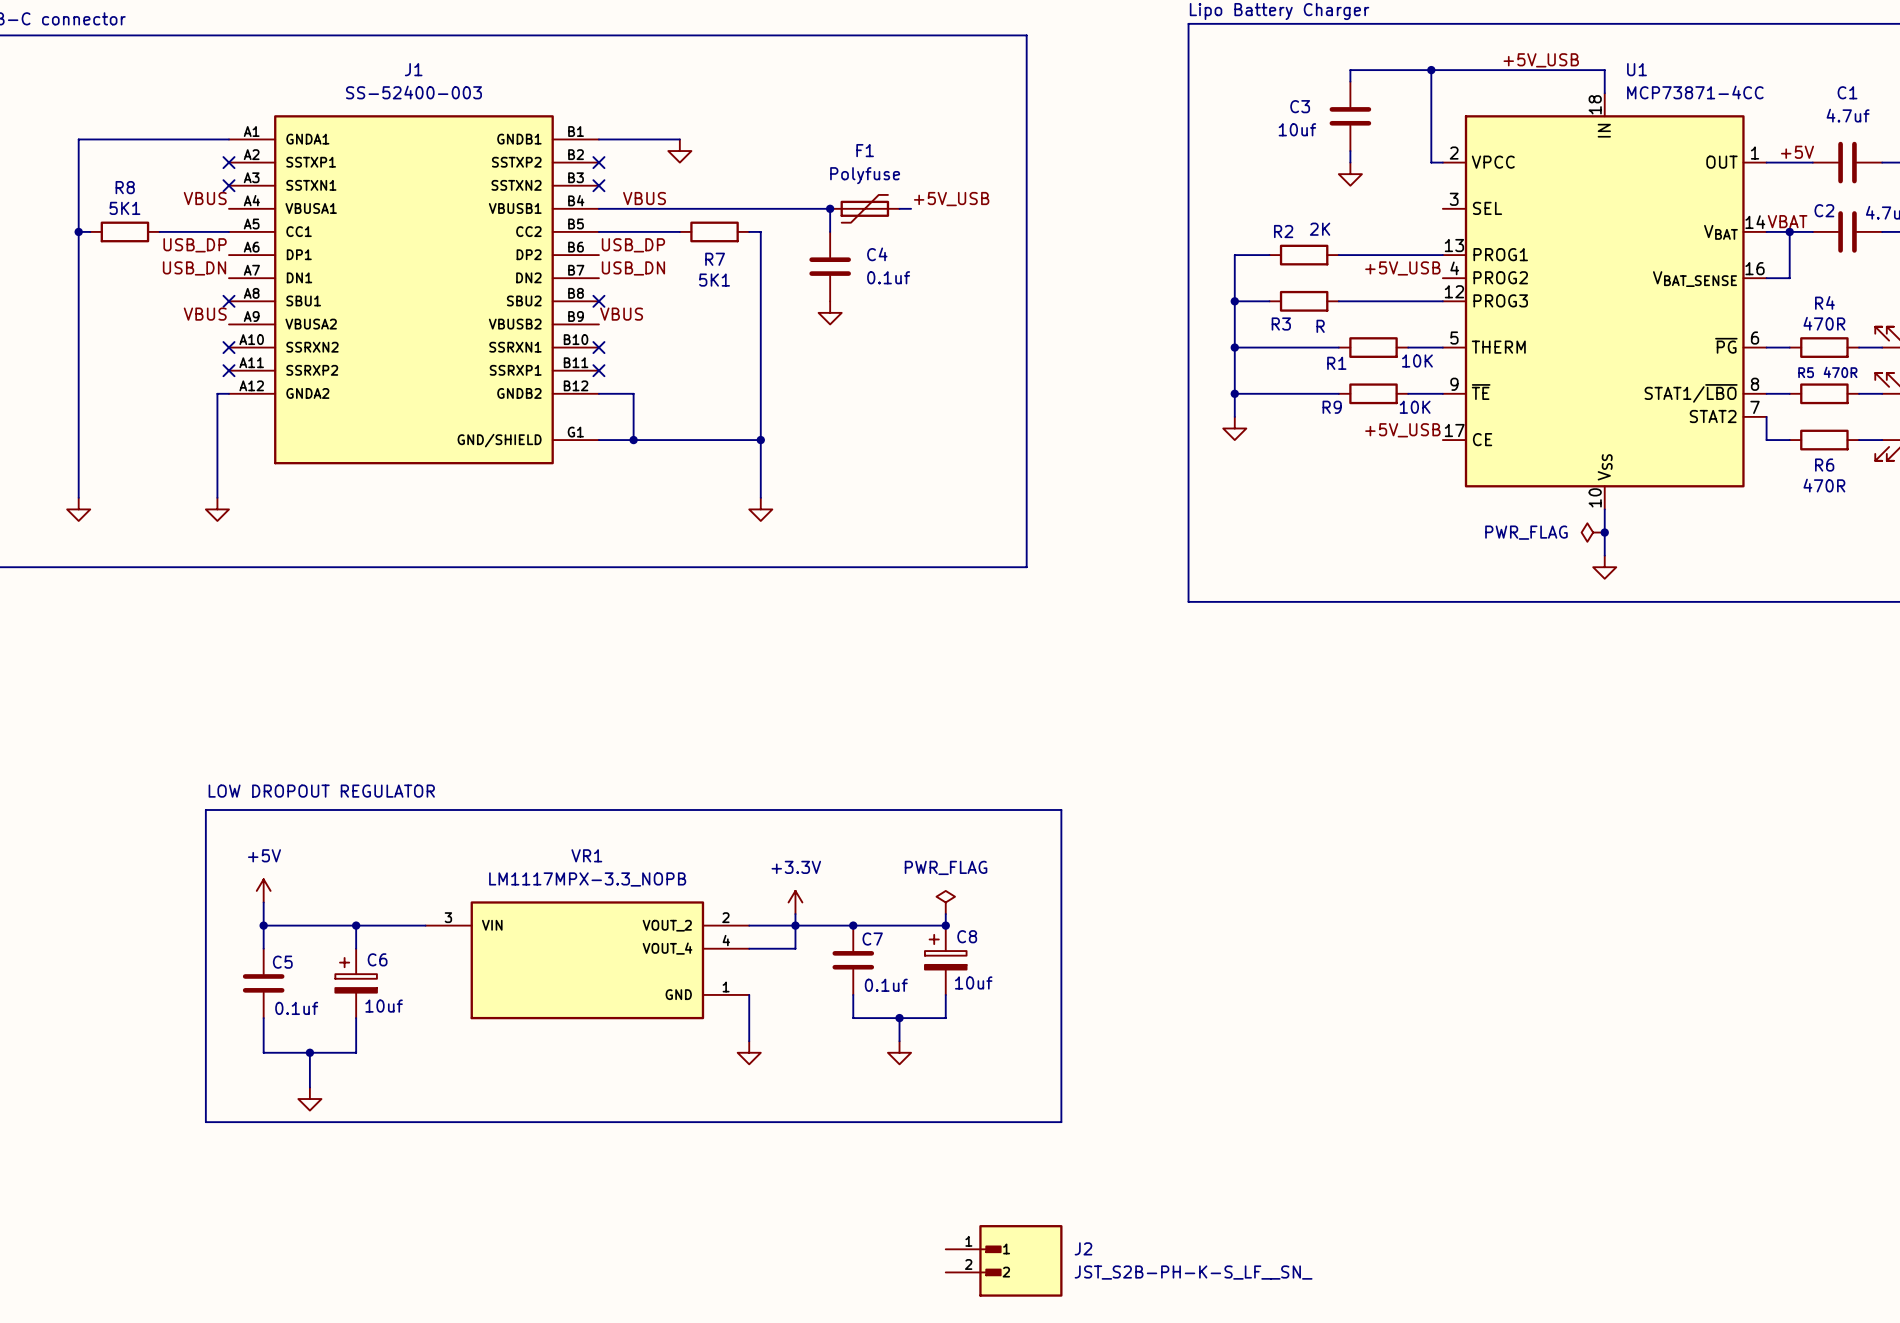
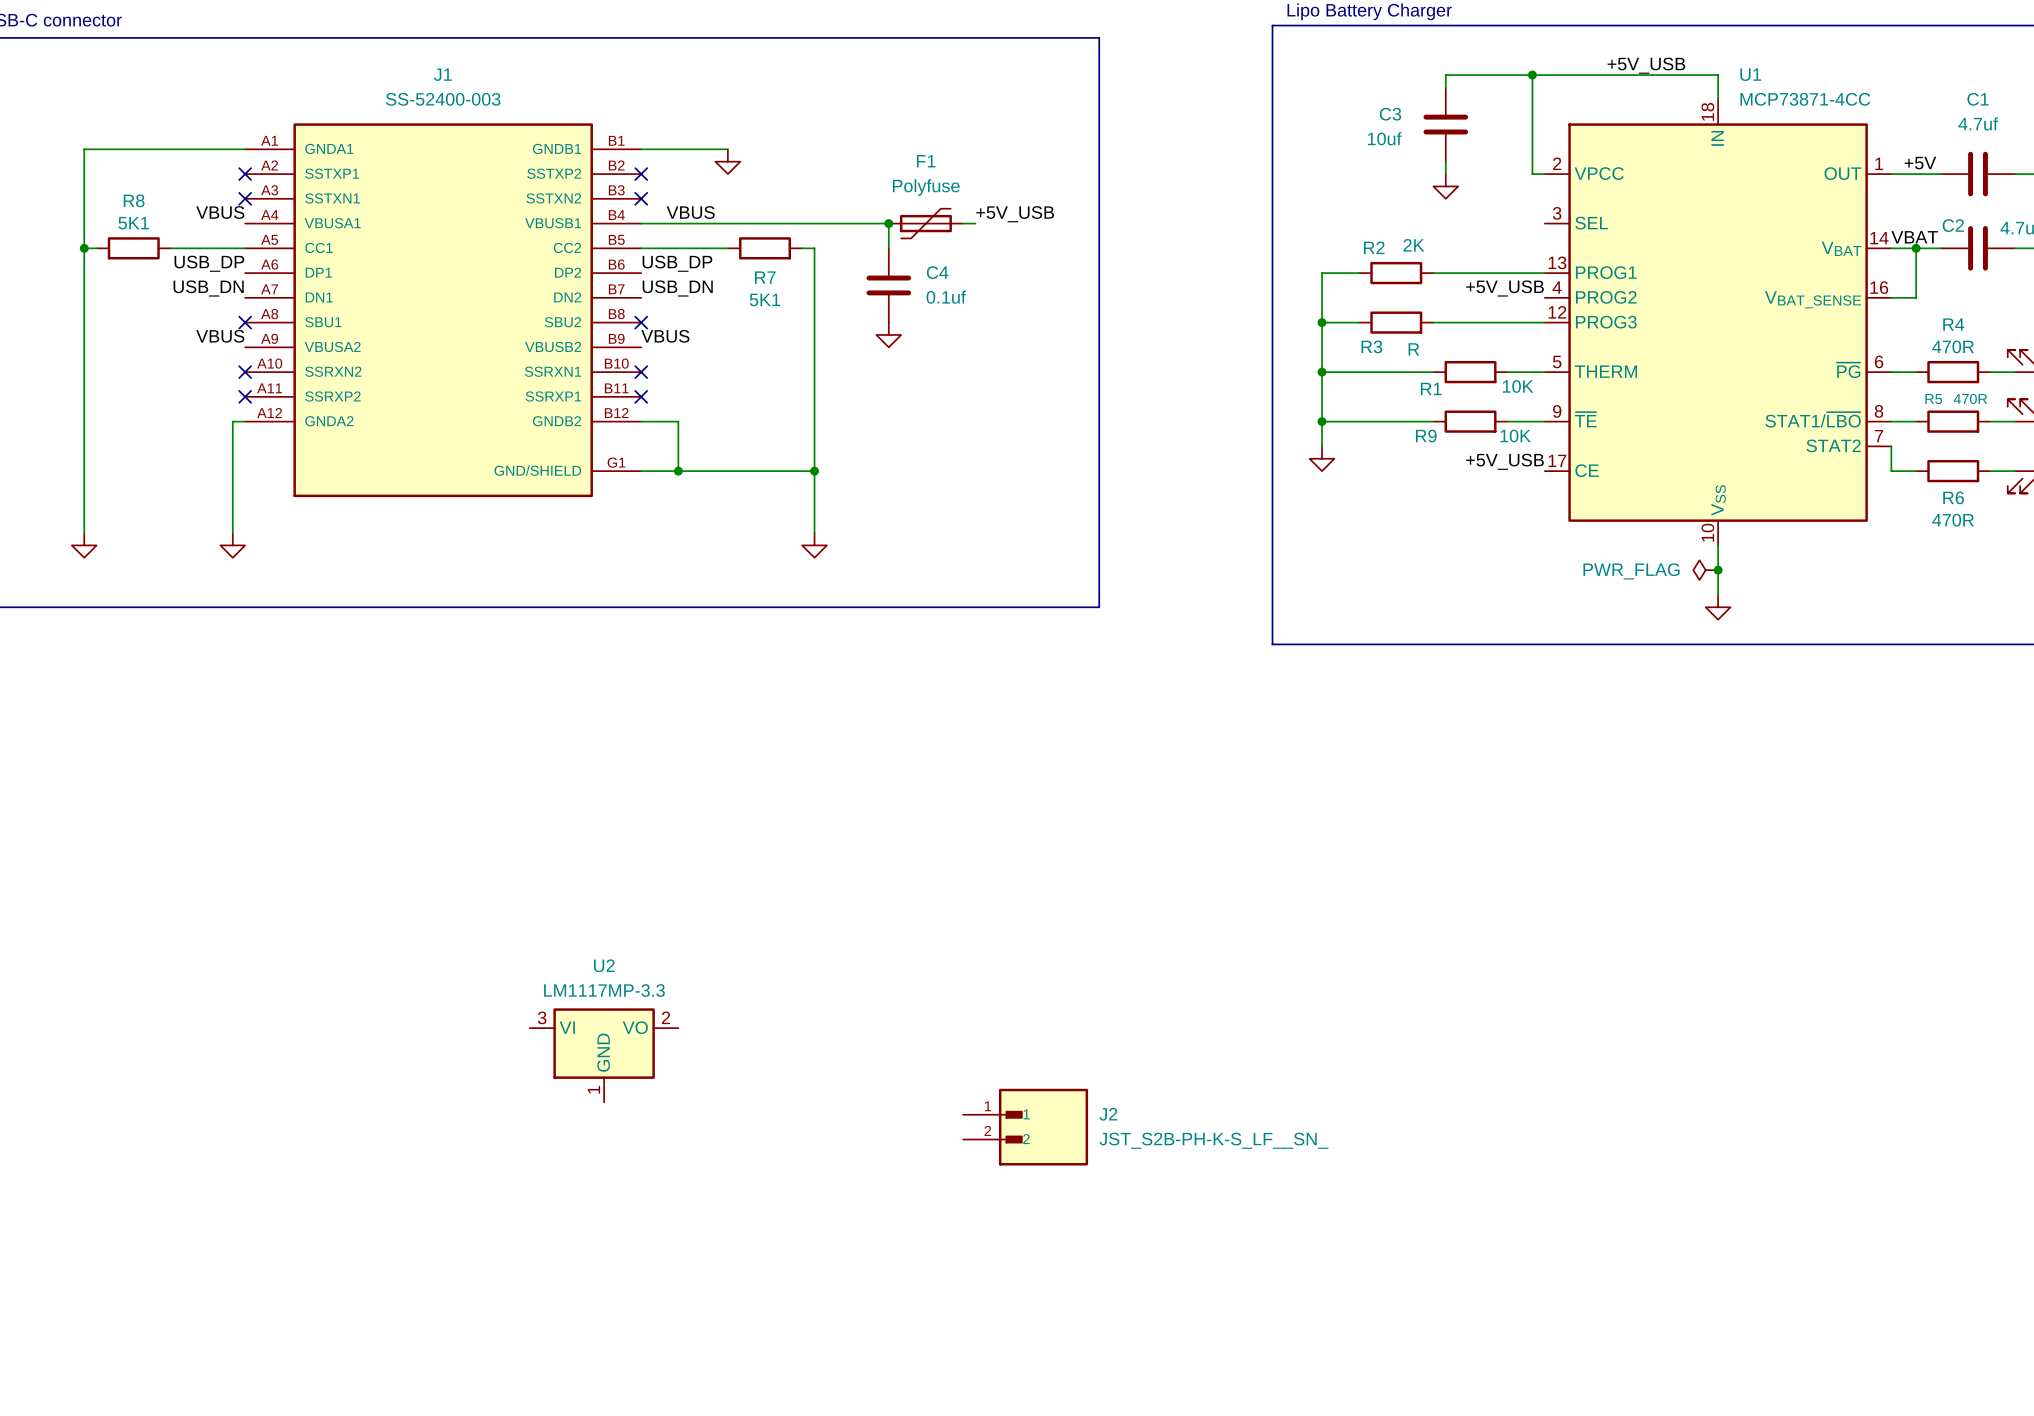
text: LOW DROPOUT REGULATOR (321, 791) -> none
line: (205, 809) (1061, 809) (1061, 1122) (205, 1122) (205, 809) -> none
power symbol: +5V (263, 890) -> none
wire: (263, 902) (263, 948) -> none
power symbol: +3.3V (795, 902) -> none
power symbol: PWR_FLAG (945, 902) -> none
wire: (795, 914) (795, 948) (749, 948) -> none
wire: (945, 914) (945, 925) (749, 925) -> none
wire: (263, 925) (425, 925) -> none
junction: (263, 925) -> none
wire: (356, 925) (356, 948) -> none
junction: (356, 925) -> none
junction: (795, 925) -> none
junction: (853, 925) -> none
junction: (945, 925) -> none
VR1: LM1117MPX-3.3_NOPB (587, 960) -> none
C7: 0.1uf (853, 960) -> none
C8: 10uf (945, 960) -> none
C5: 0.1uf (263, 983) -> none
C6: 10uf (356, 983) -> none
U2: none -> LM1117MP-3.3 (604, 1055)
wire: (749, 994) (749, 1041) -> none
wire: (853, 994) (853, 1018) (945, 1018) (945, 994) -> none
wire: (263, 1018) (263, 1052) (356, 1052) (356, 1018) -> none
wire: (899, 1018) (899, 1041) -> none
junction: (899, 1018) -> none
wire: (309, 1052) (309, 1087) -> none
junction: (309, 1052) -> none
power symbol: (749, 1052) -> none
power symbol: (899, 1052) -> none
power symbol: (309, 1099) -> none
J2 position: (1004, 1260) -> (1025, 1127)

